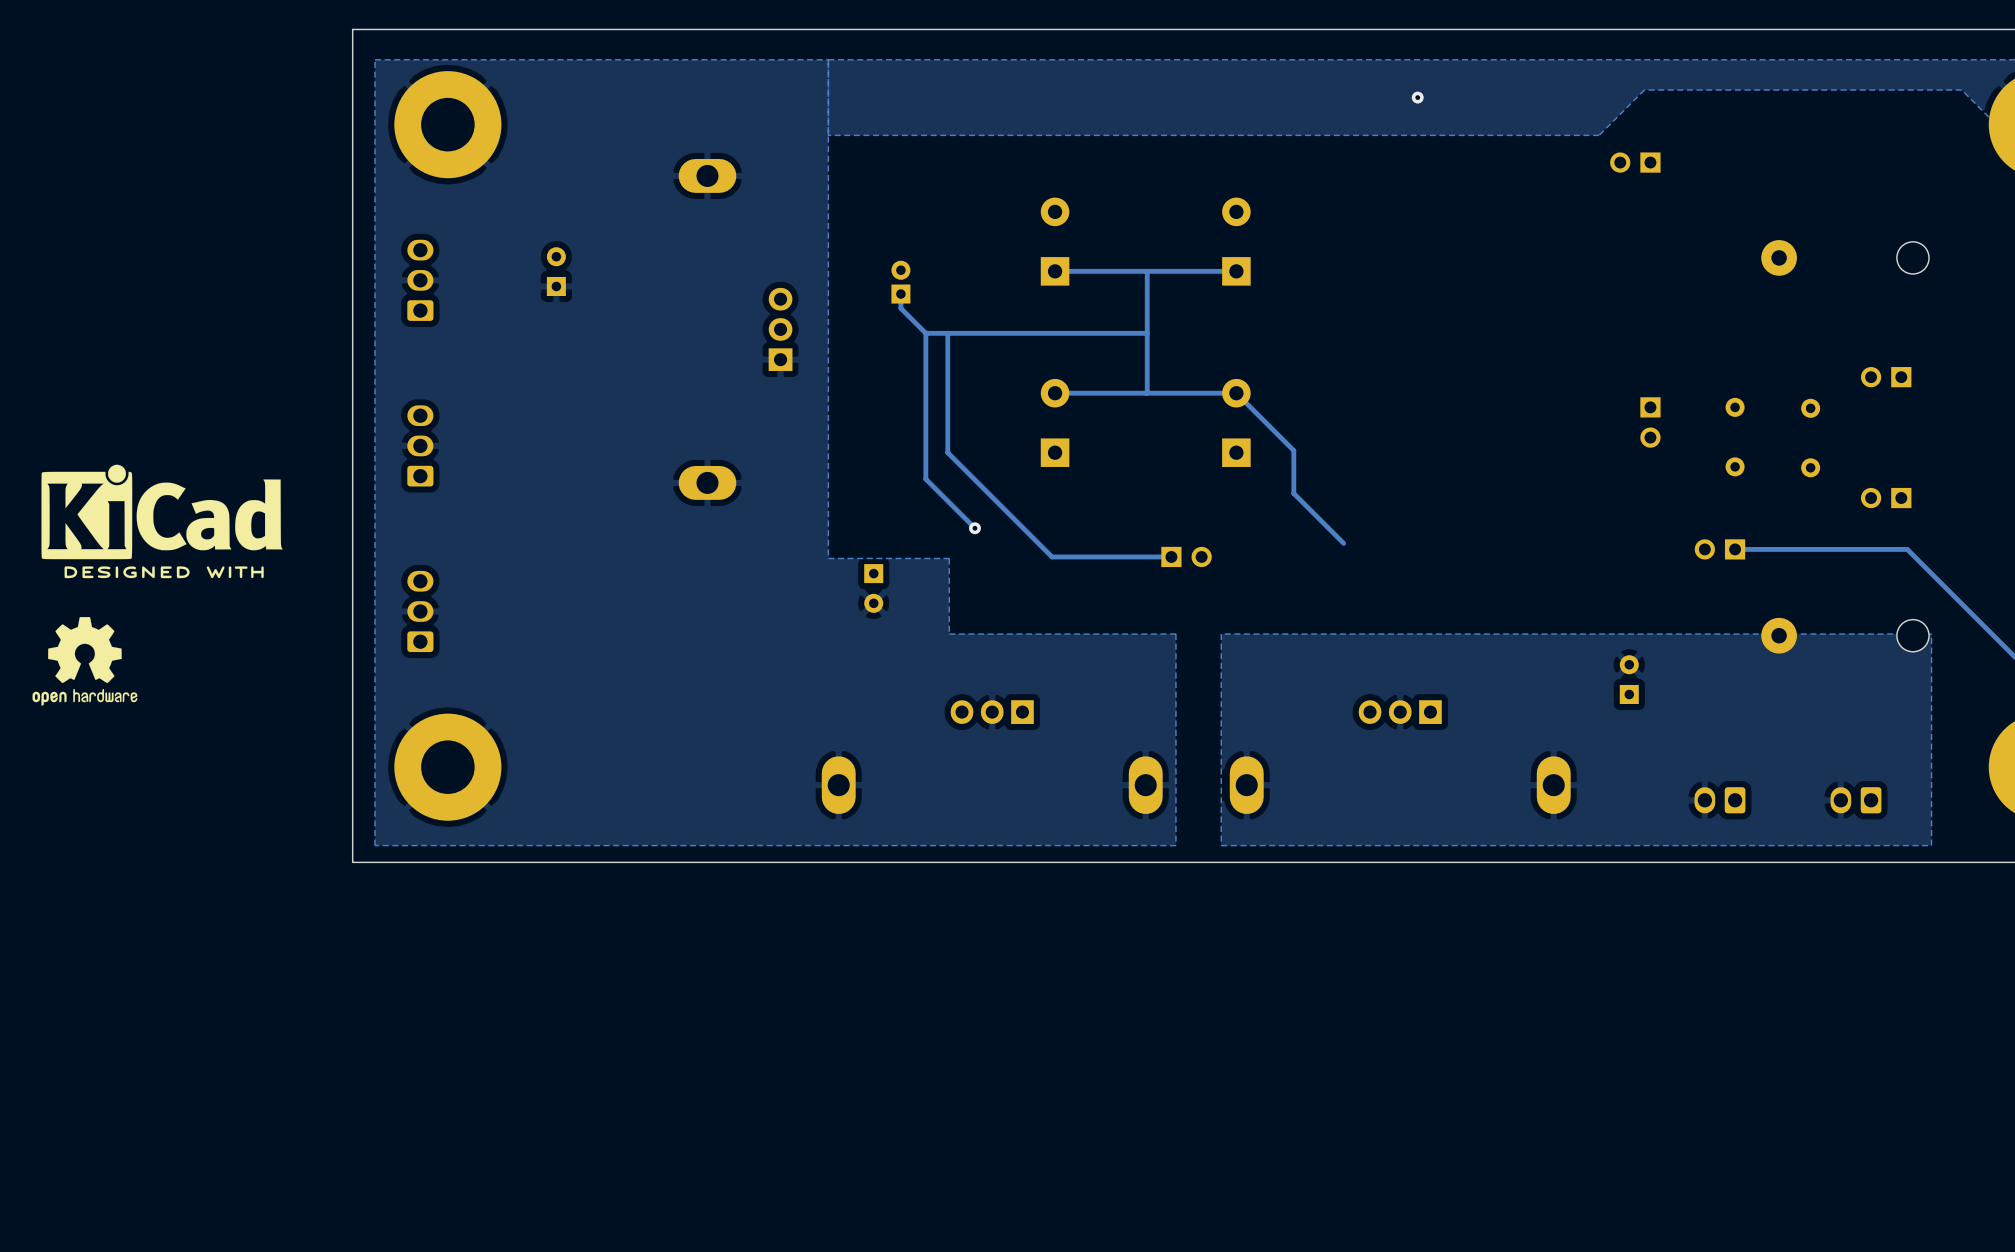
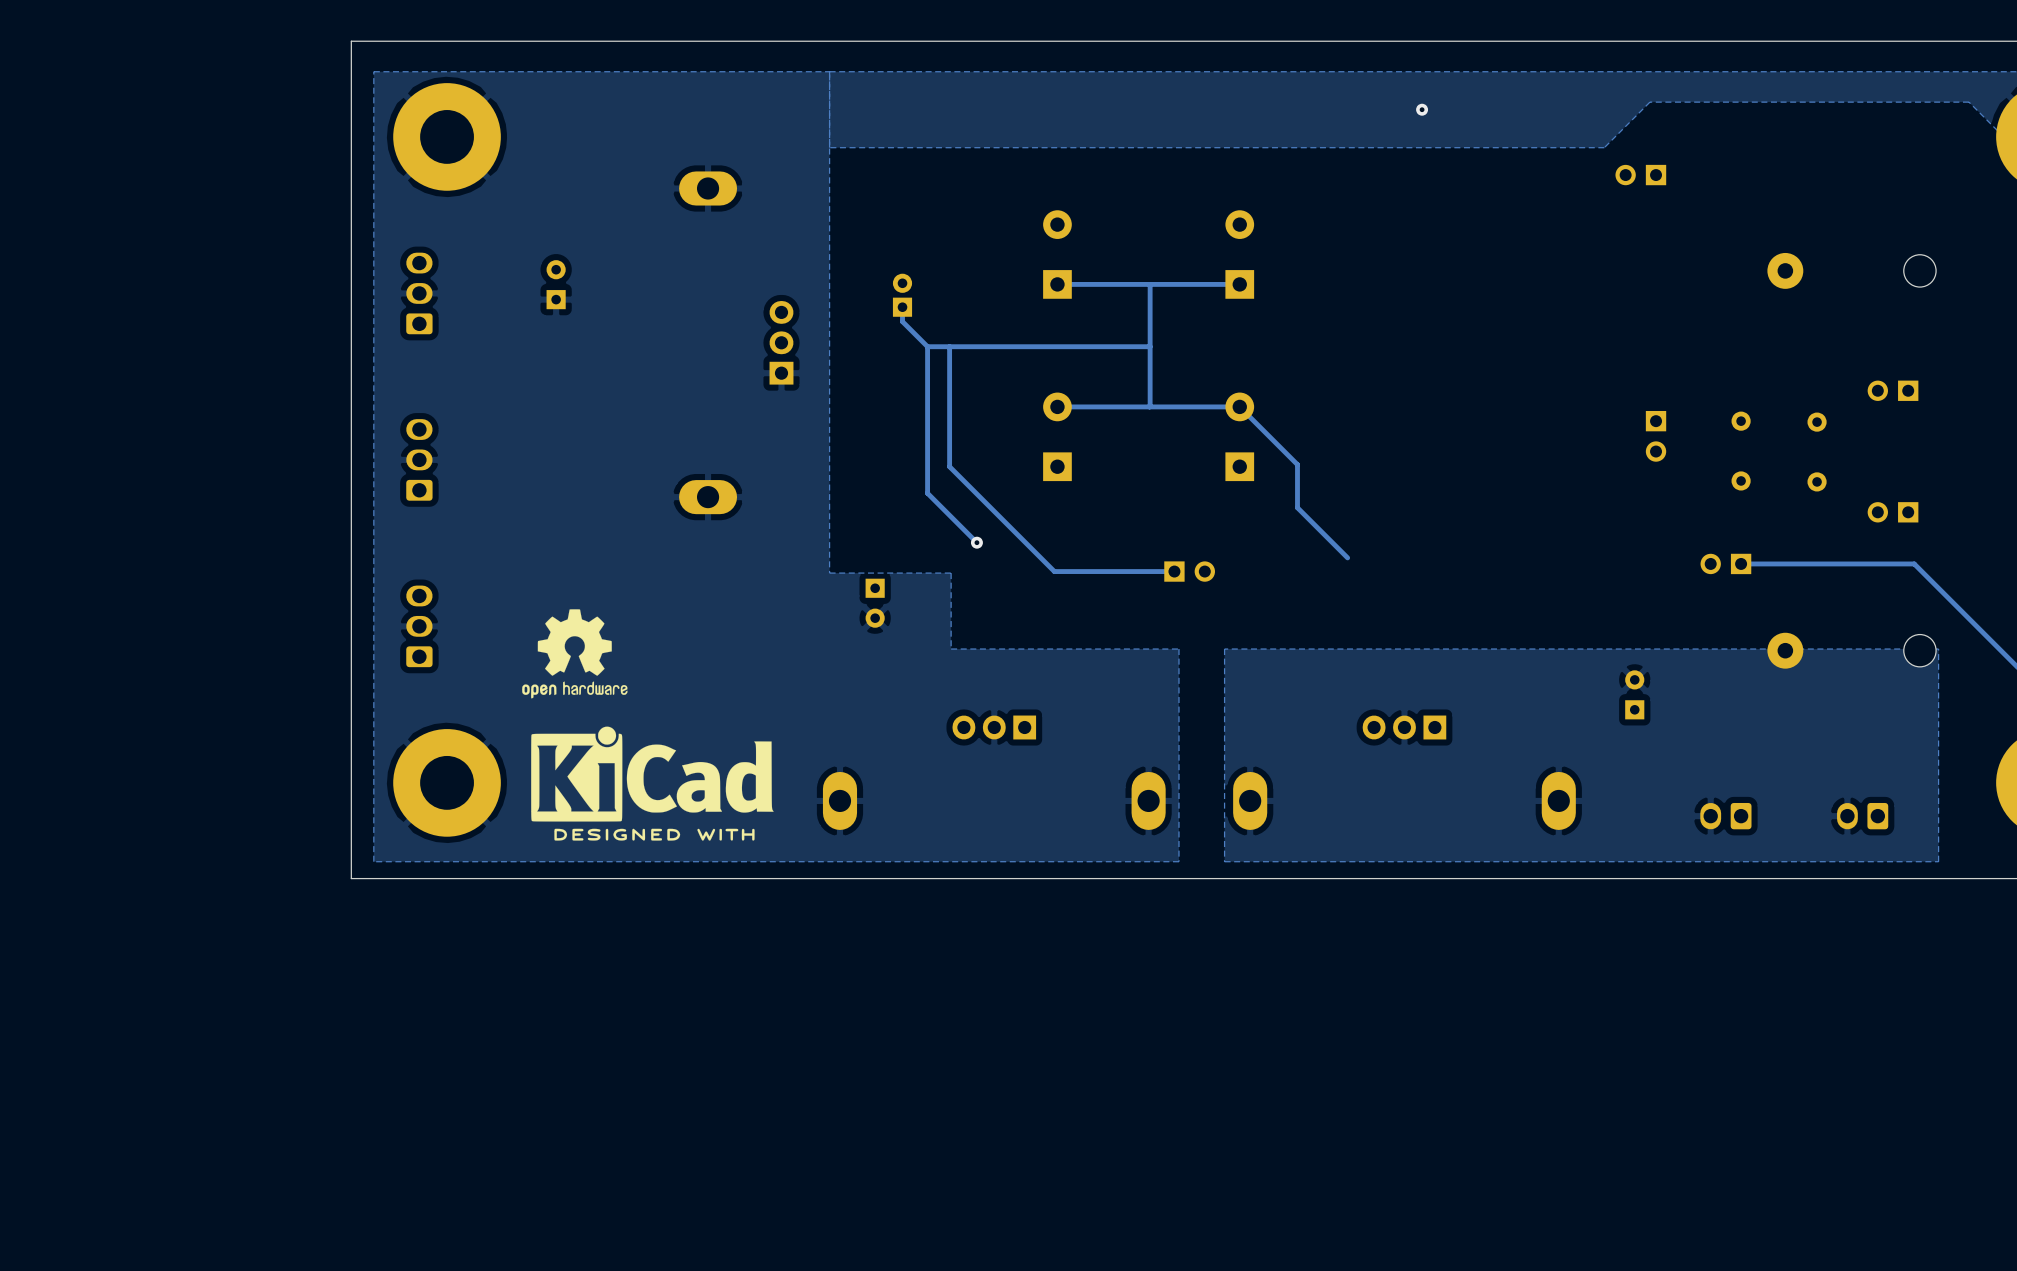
drawing: [41, 464, 283, 579] -> none
drawing: none -> [522, 609, 628, 699]
drawing: [32, 617, 138, 706] -> none
drawing: none -> [531, 726, 774, 841]

